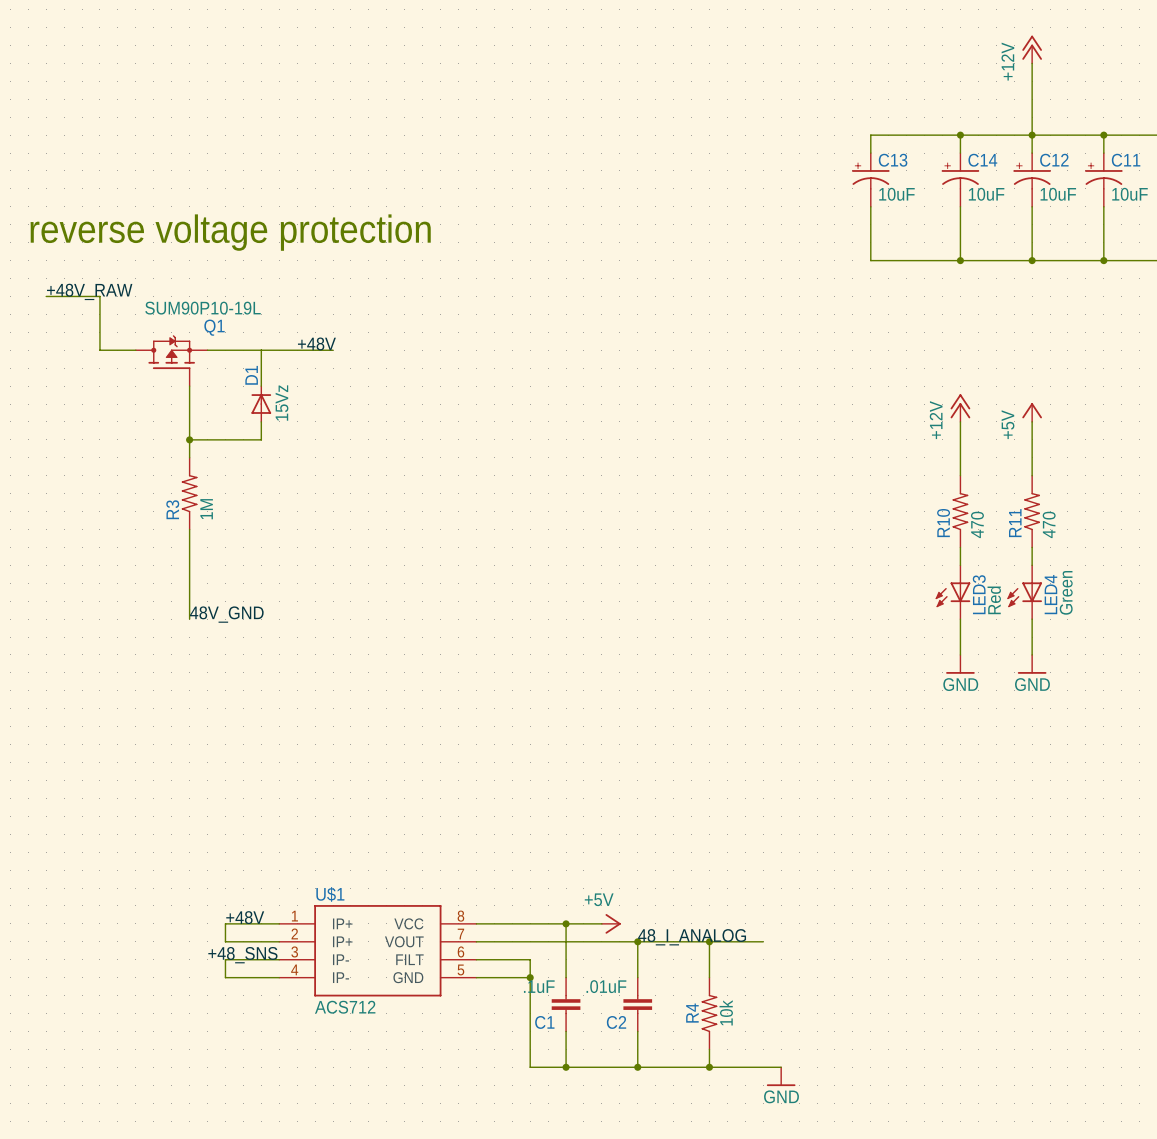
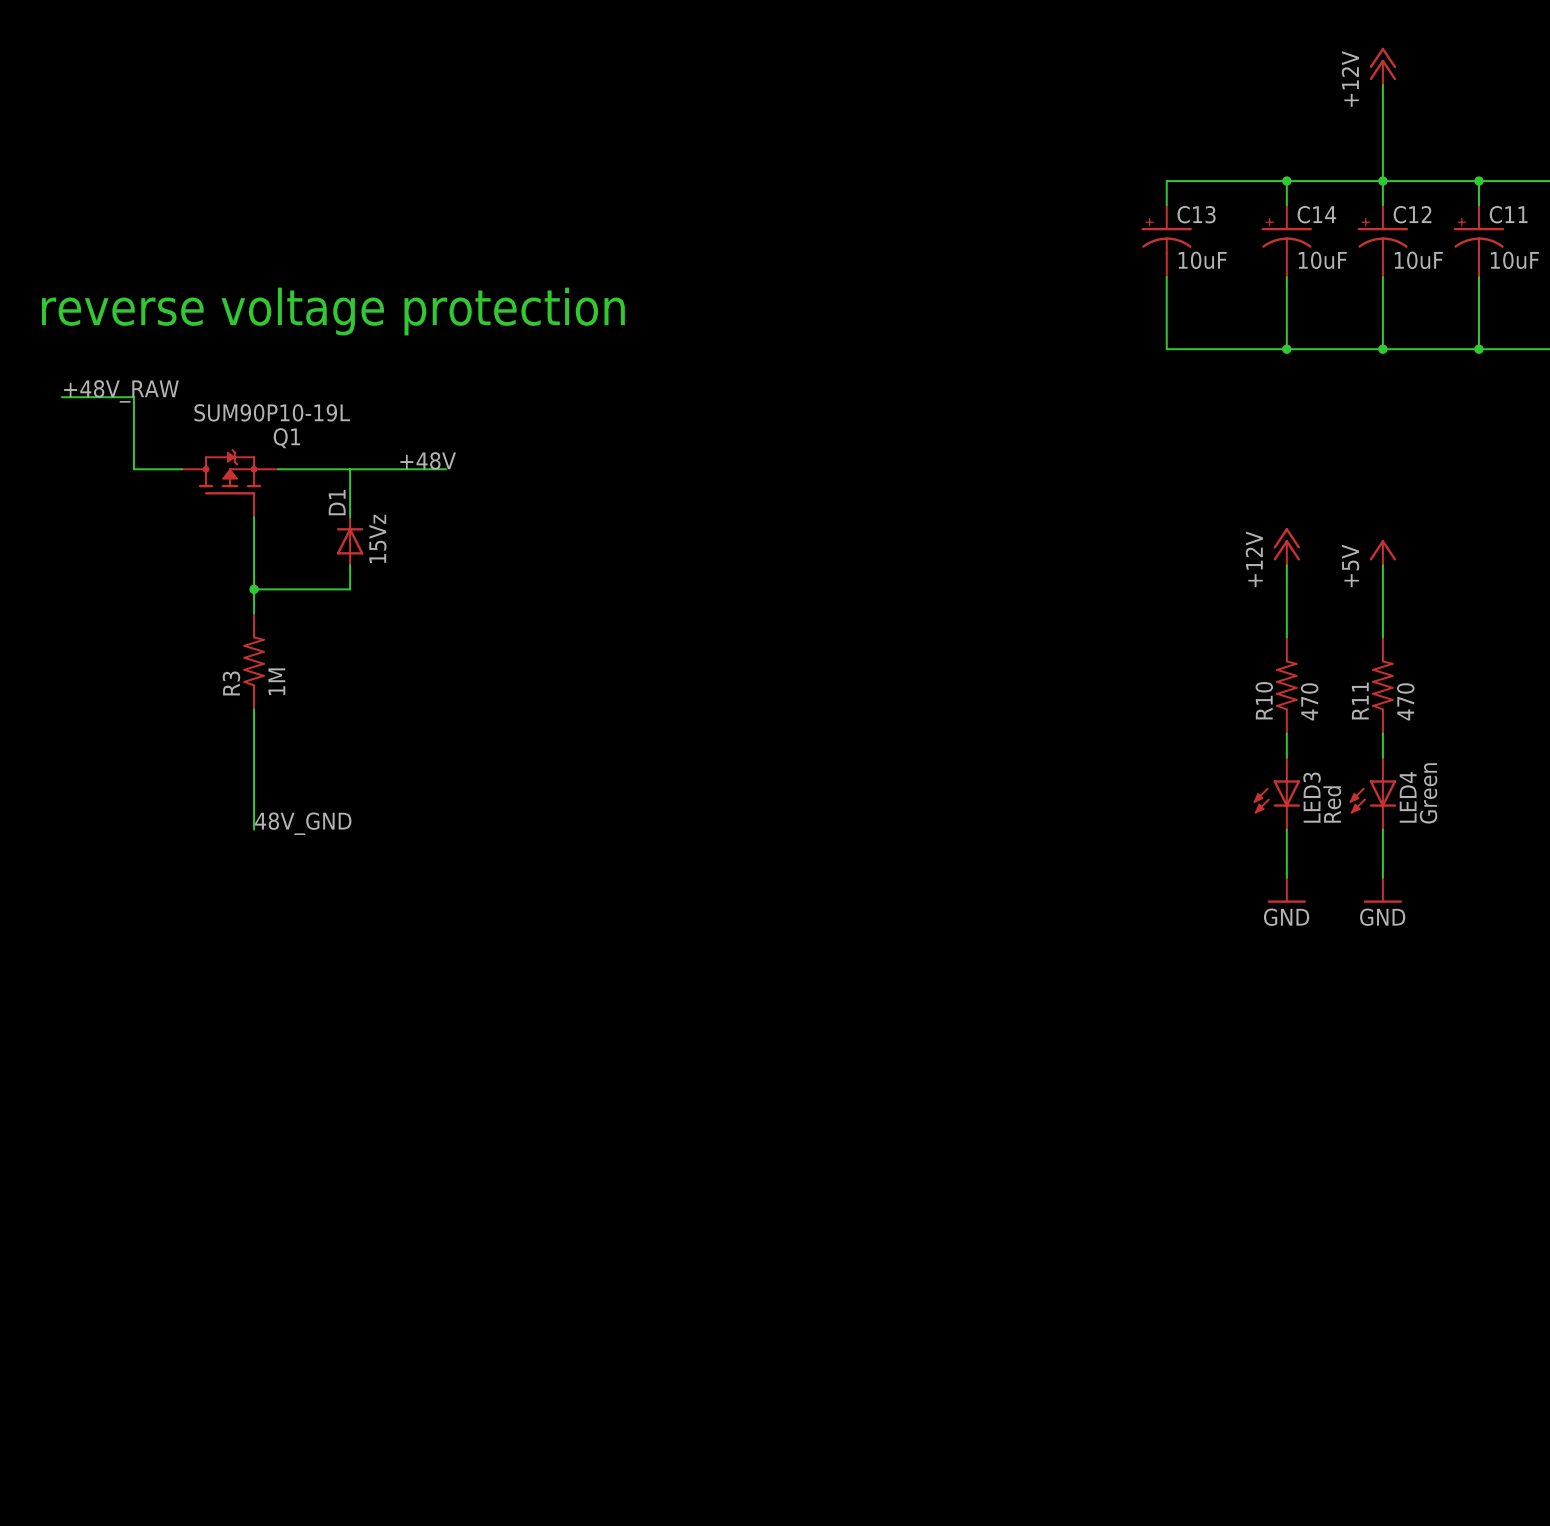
label: +48V (245, 917) -> none
wire: (279, 923) (225, 923) (225, 941) (279, 941) -> none
wire: (476, 923) (601, 923) -> none
wire: (566, 923) (566, 977) -> none
junction: (566, 923) -> none
power symbol: +5V (611, 923) -> none
label: 48_I_ANALOG (692, 937) -> none
wire: (476, 941) (763, 941) -> none
wire: (637, 941) (637, 977) -> none
junction: (637, 941) -> none
wire: (709, 941) (709, 977) -> none
junction: (709, 941) -> none
U$1: ACS712 (377, 950) -> none
label: +48_SNS (242, 955) -> none
wire: (279, 959) (225, 959) (225, 977) (279, 977) -> none
wire: (476, 959) (530, 959) (530, 1067) (781, 1067) -> none
wire: (476, 977) (530, 977) -> none
junction: (530, 977) -> none
C1: .1uF (566, 1004) -> none
C2: .01uF (637, 1004) -> none
R4: 10k (709, 1013) -> none
wire: (566, 1031) (566, 1067) -> none
wire: (637, 1031) (637, 1067) -> none
wire: (709, 1049) (709, 1067) -> none
junction: (566, 1067) -> none
junction: (637, 1067) -> none
junction: (709, 1067) -> none
power symbol: GND (781, 1076) -> none

